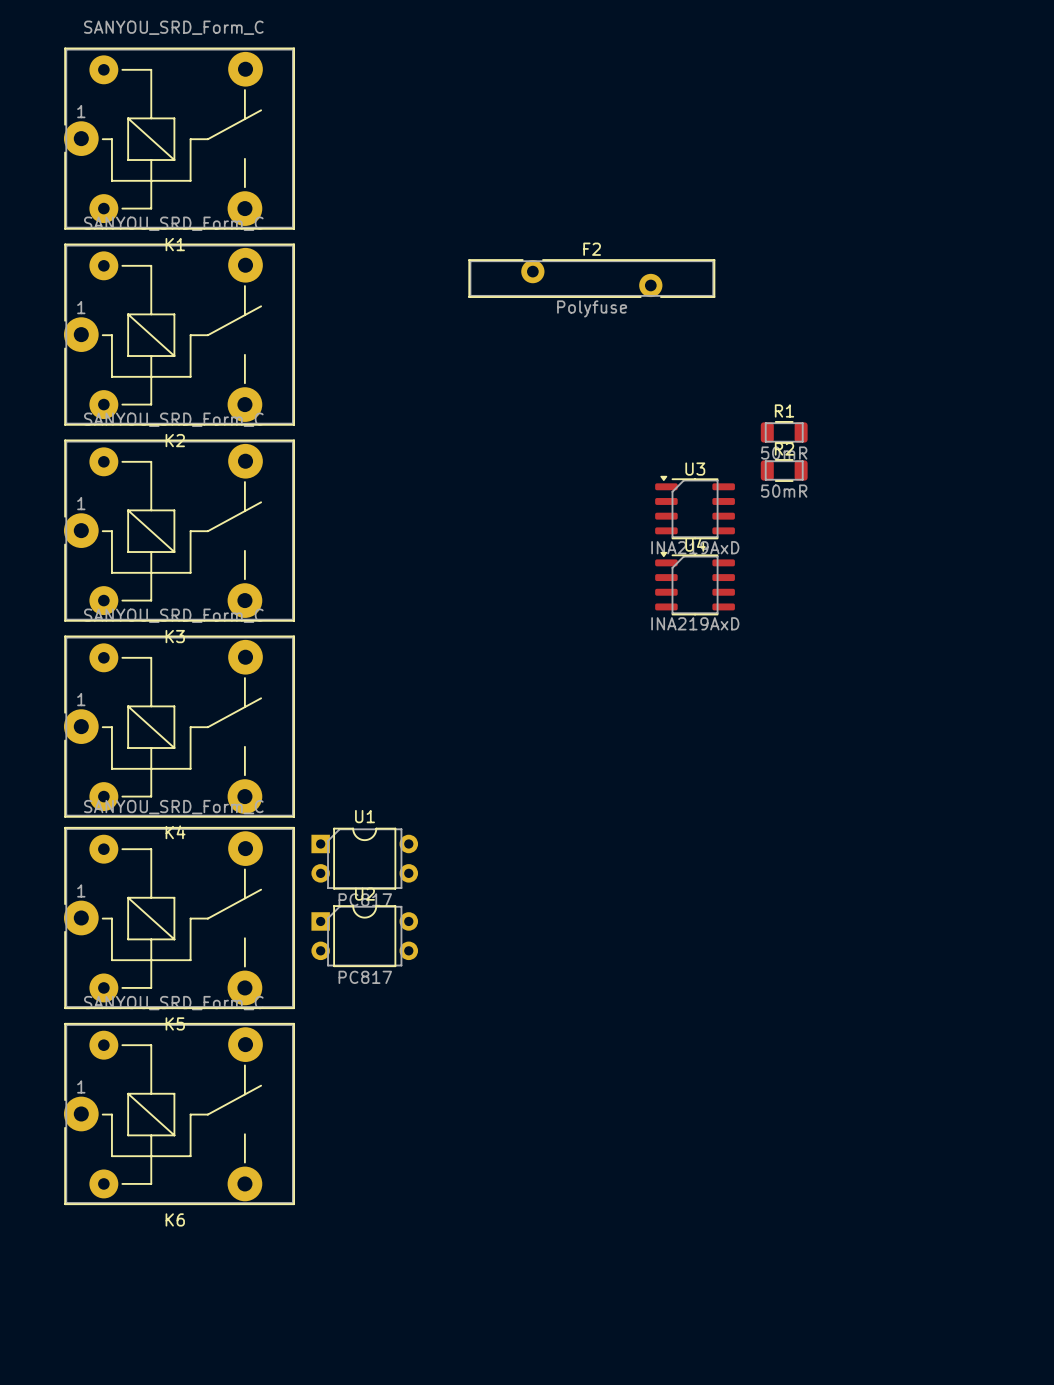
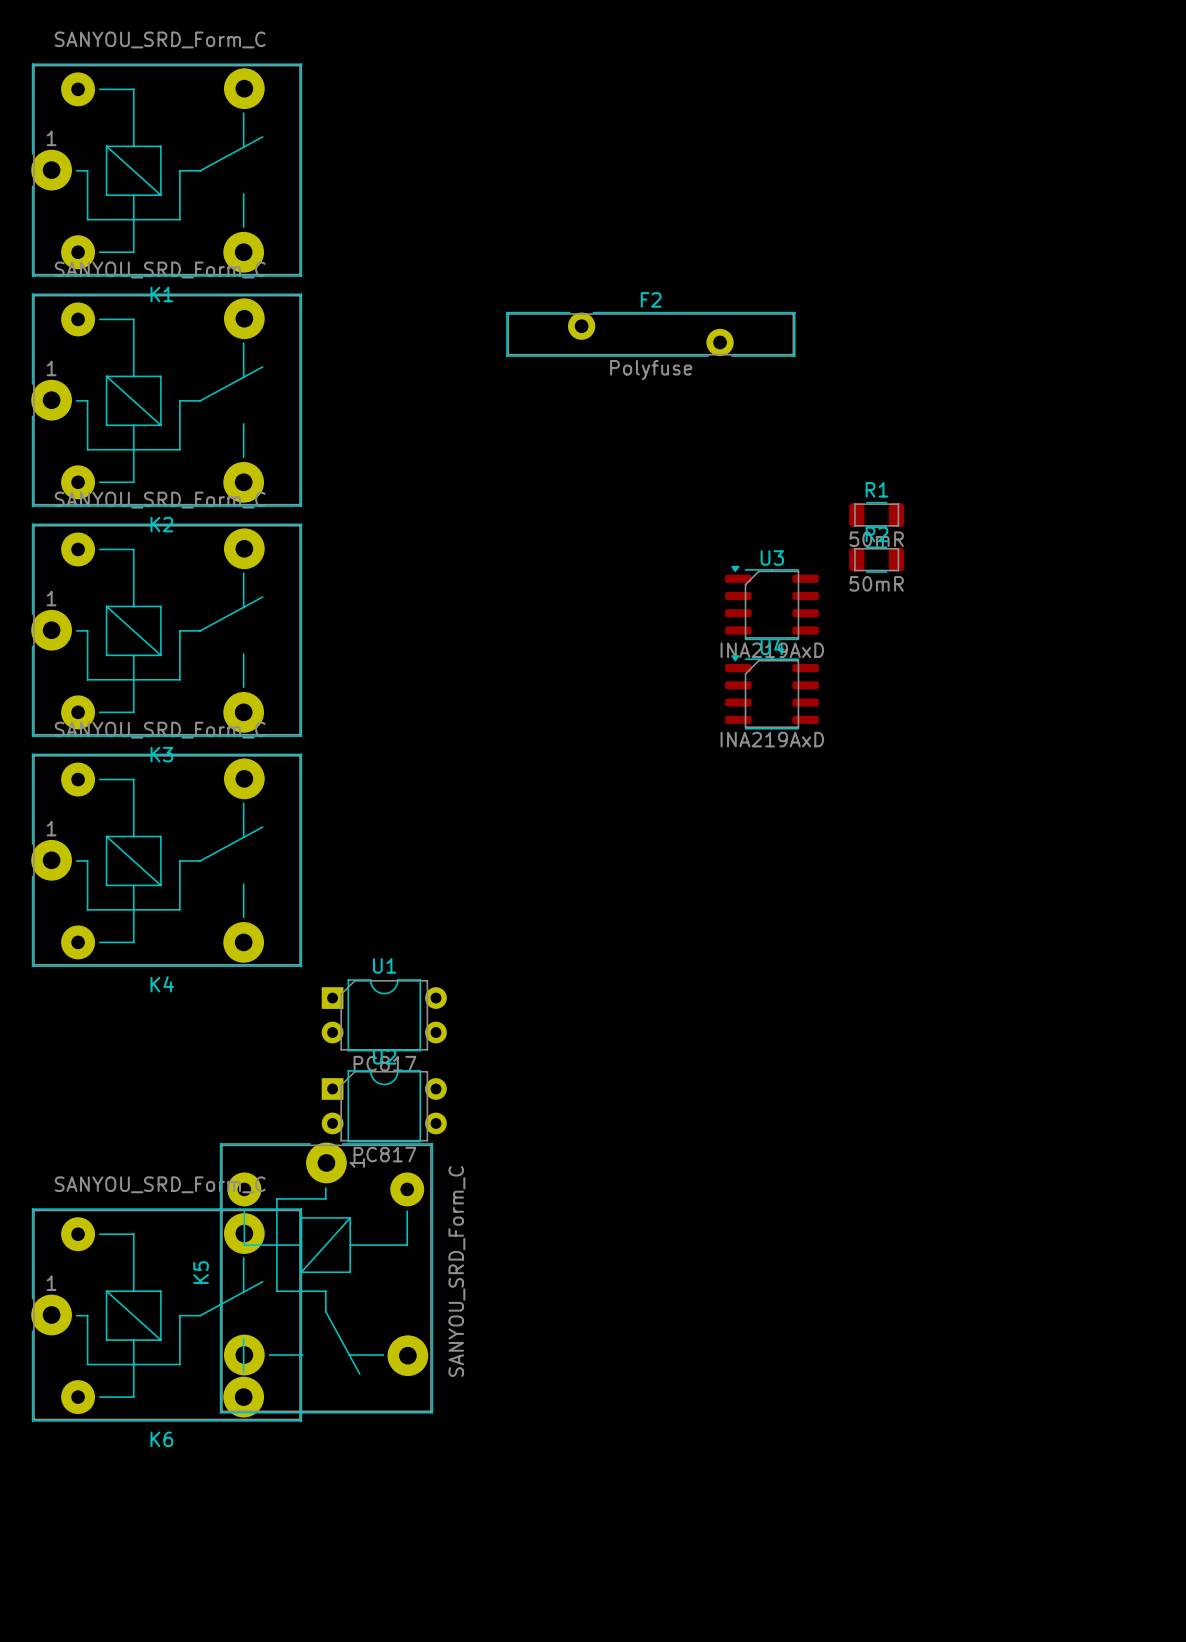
K5 rotation: 0° (179, 917) -> 90° clockwise (326, 1278)
K5 position: (179, 917) -> (326, 1278)

